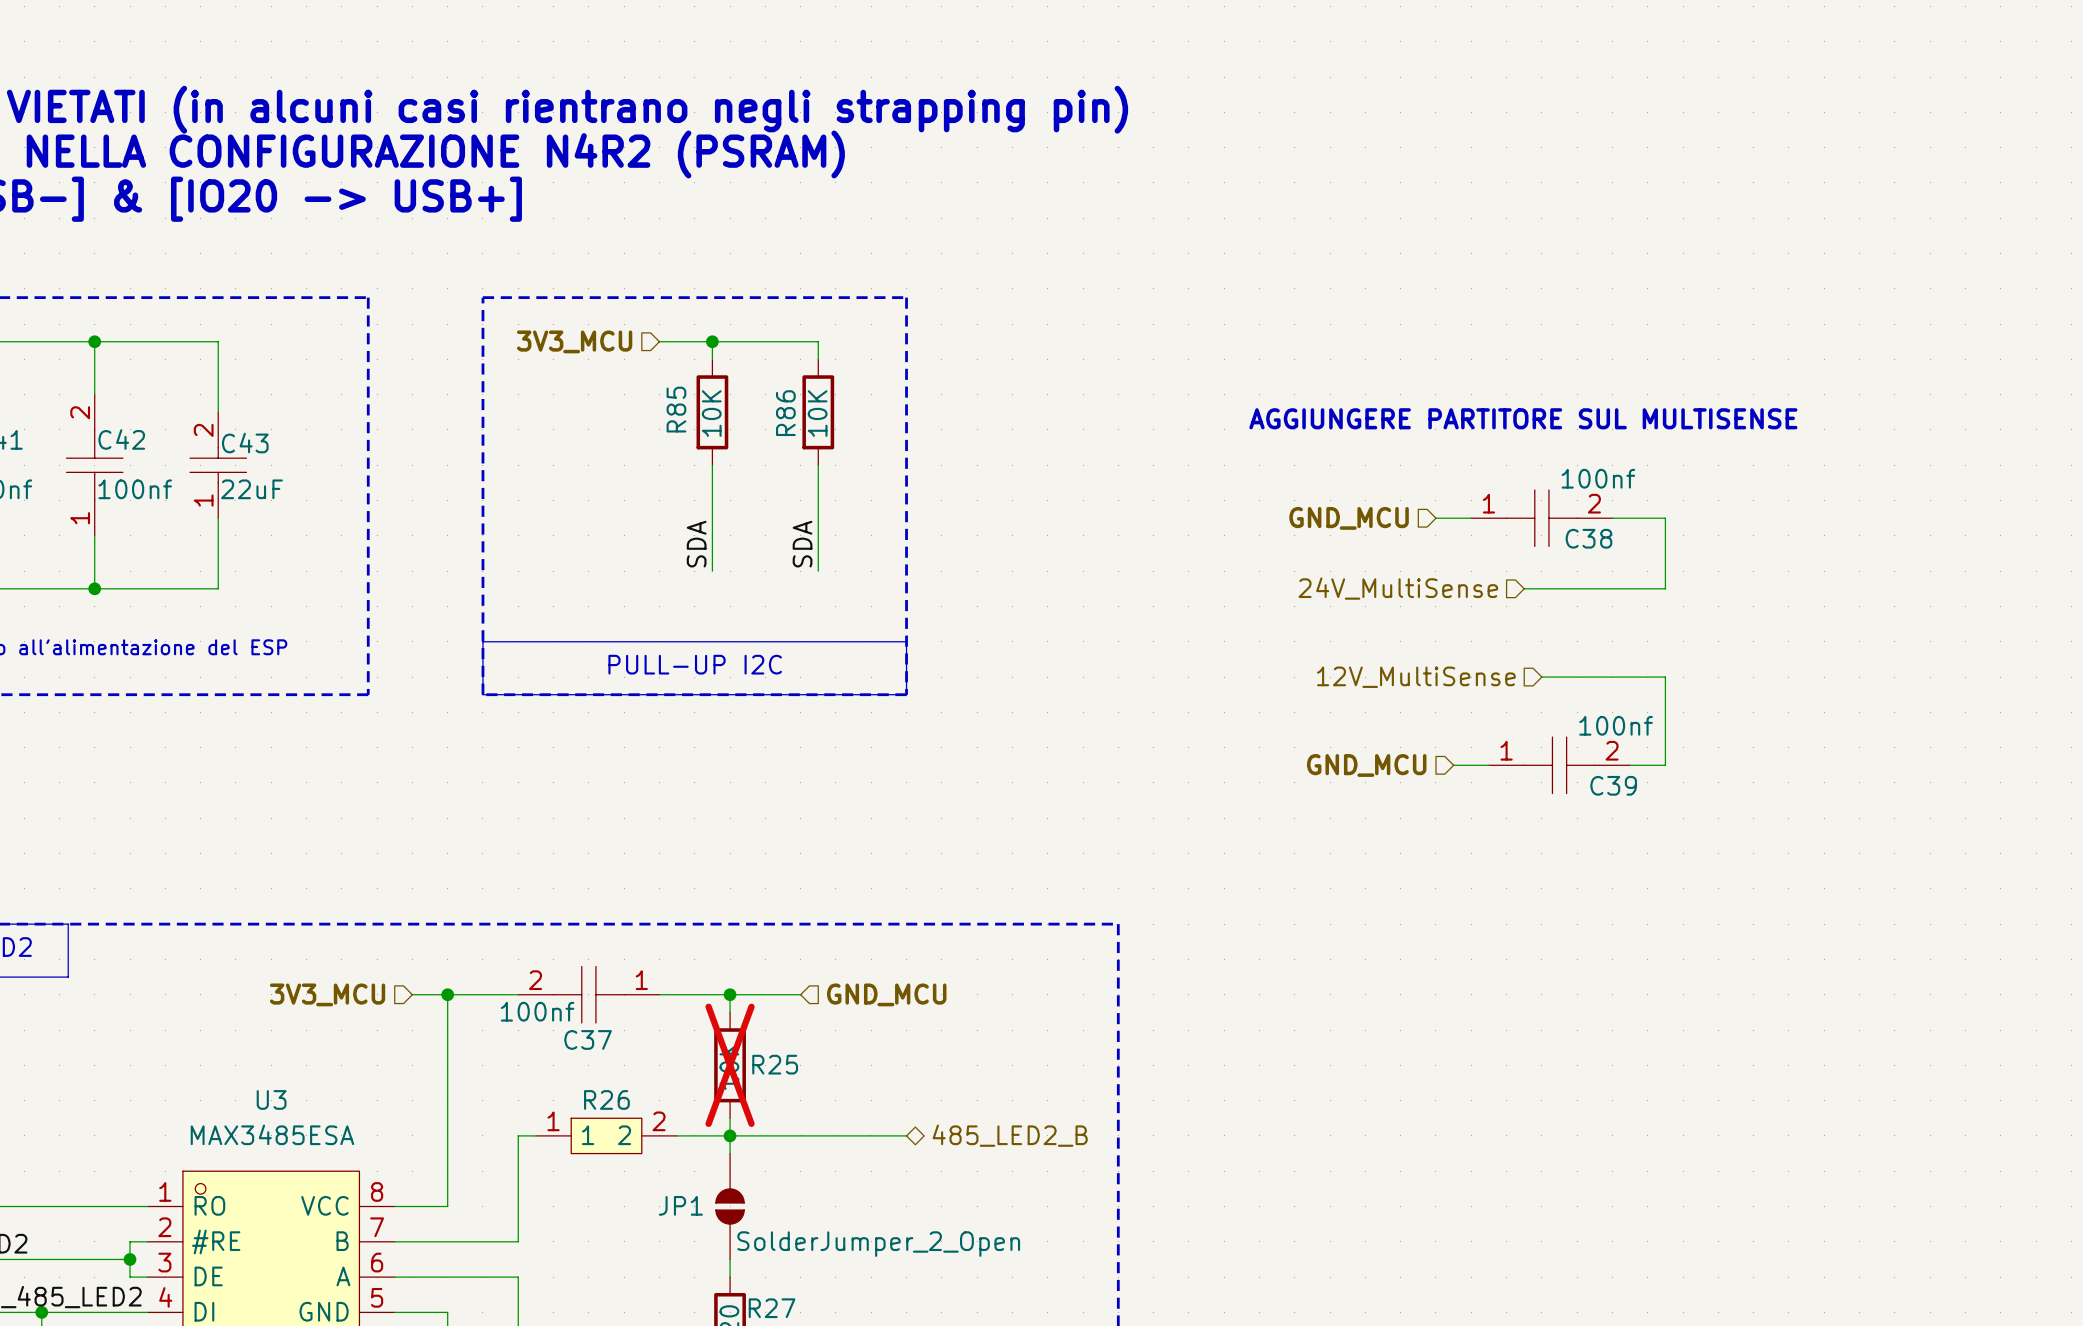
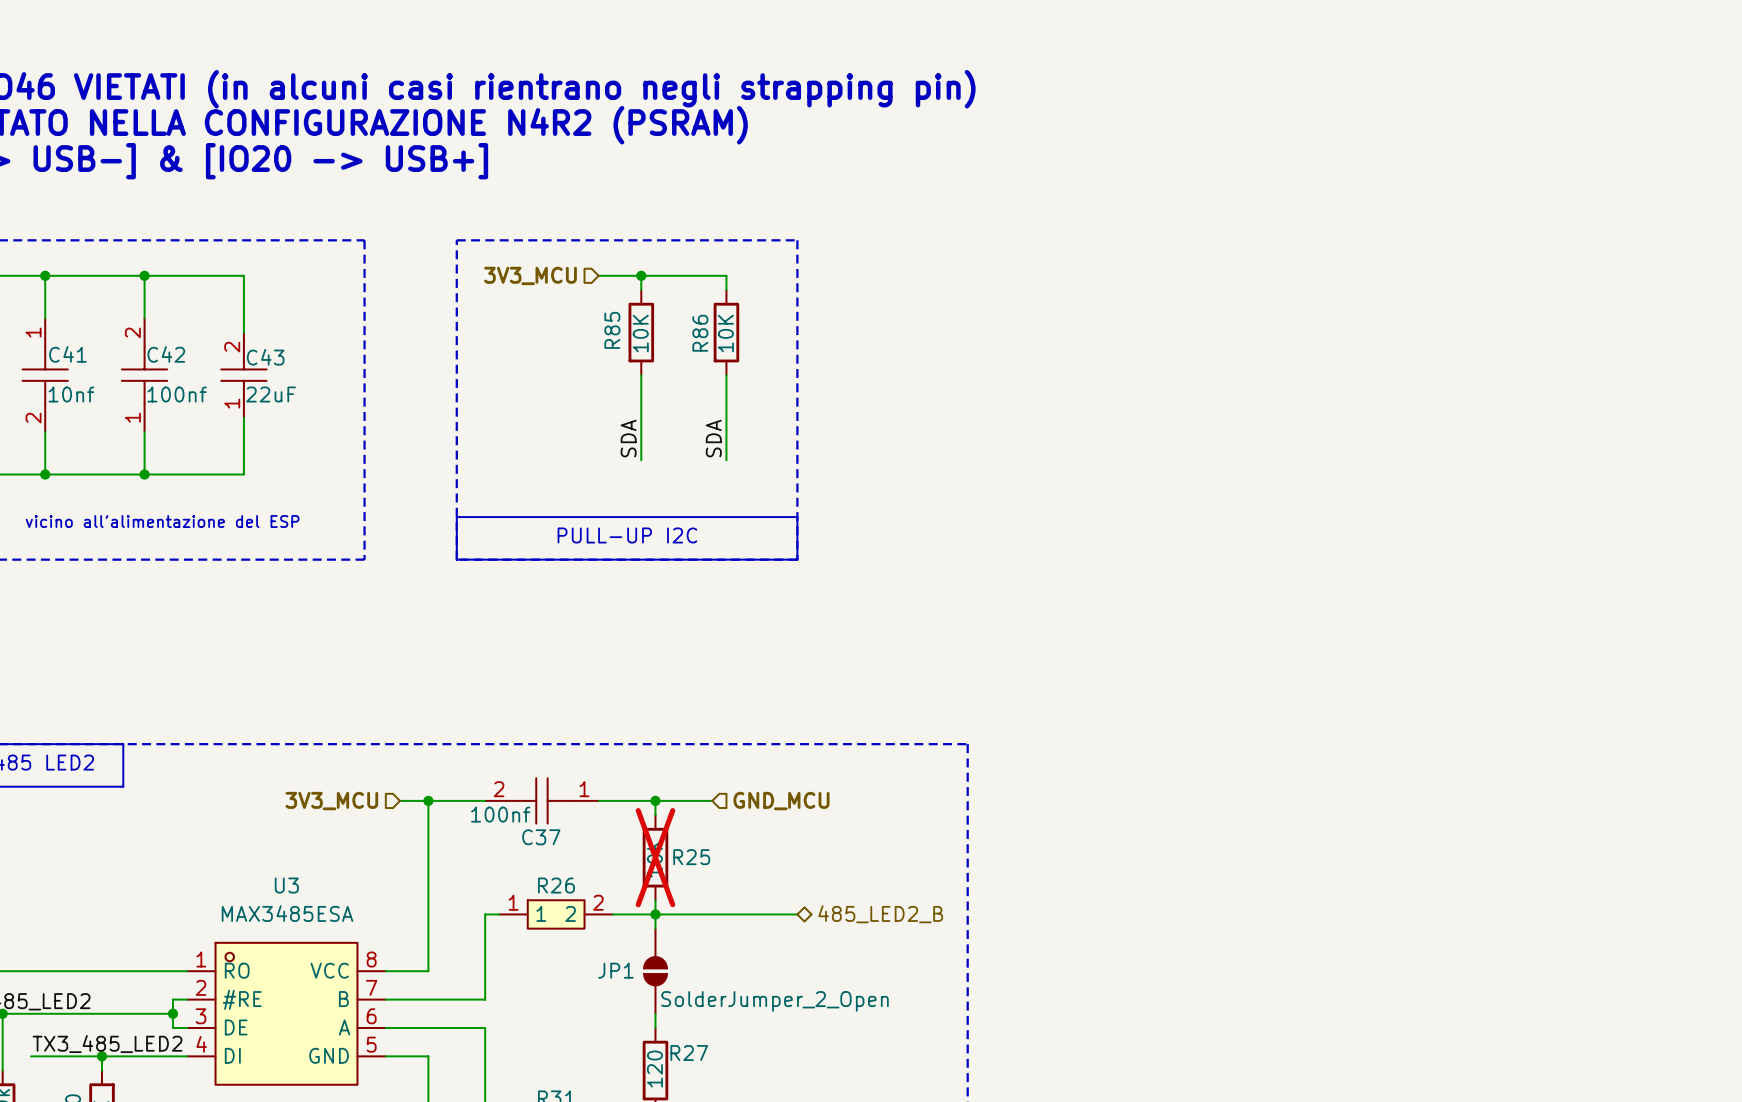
text: AGGIUNGERE PARTITORE SUL MULTISENSE (1523, 418) -> none
hierarchical label: GND_MCU (1349, 518) -> none
wire: (1435, 518) (1471, 518) -> none
C38: 100nf (1541, 518) -> none
wire: (1612, 518) (1665, 518) (1665, 588) (1524, 588) -> none
hierarchical label: 24V_MultiSense (1398, 588) -> none
hierarchical label: 12V_MultiSense (1416, 677) -> none
wire: (1541, 677) (1665, 677) (1665, 765) (1630, 765) -> none
hierarchical label: GND_MCU (1366, 765) -> none
wire: (1453, 765) (1488, 765) -> none
C39: 100nf (1559, 765) -> none

